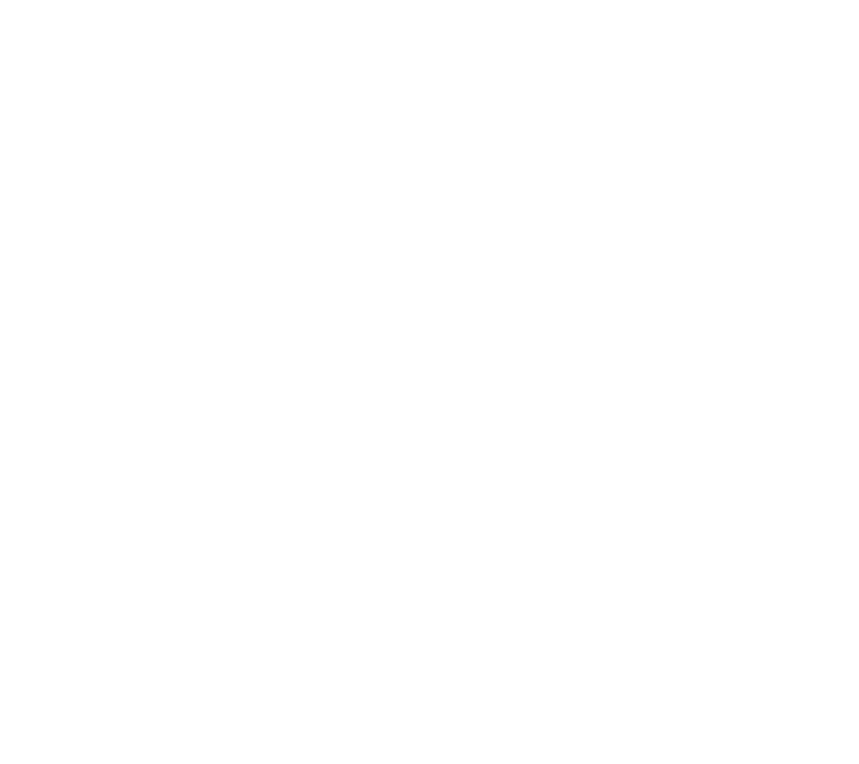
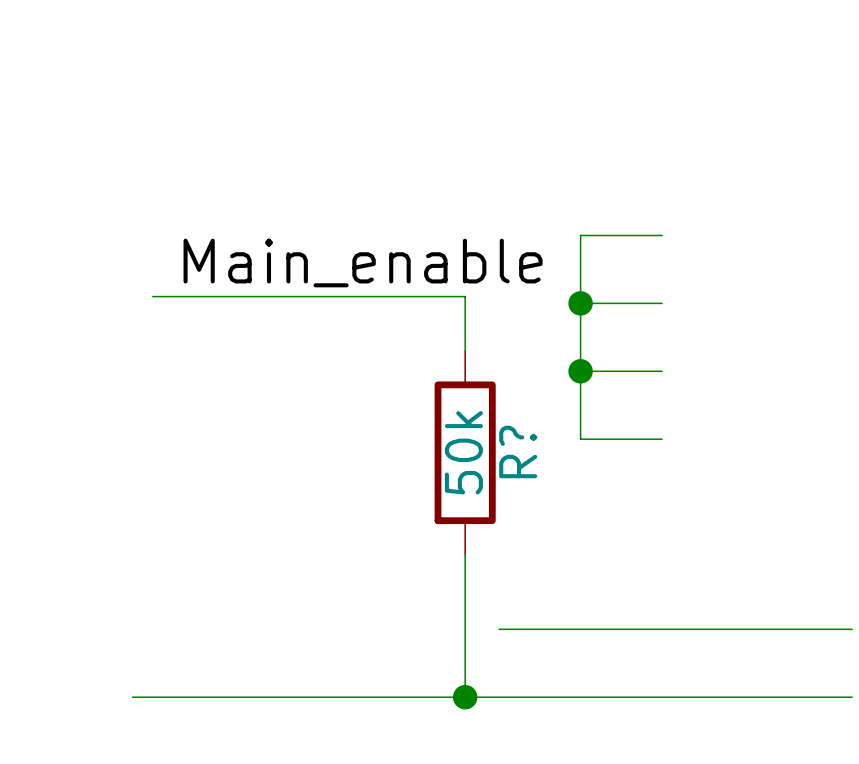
wire: none -> (662, 235) (580, 235) (580, 439) (662, 439)
label: none -> Main_enable (363, 263)
wire: none -> (152, 296) (465, 296) (465, 350)
wire: none -> (580, 303) (662, 303)
junction: none -> (580, 303)
wire: none -> (580, 371) (662, 371)
junction: none -> (580, 371)
R?: none -> 50k (465, 452)
wire: none -> (465, 554) (465, 697)
wire: none -> (499, 629) (852, 629)
wire: none -> (132, 697) (852, 697)
junction: none -> (465, 697)

